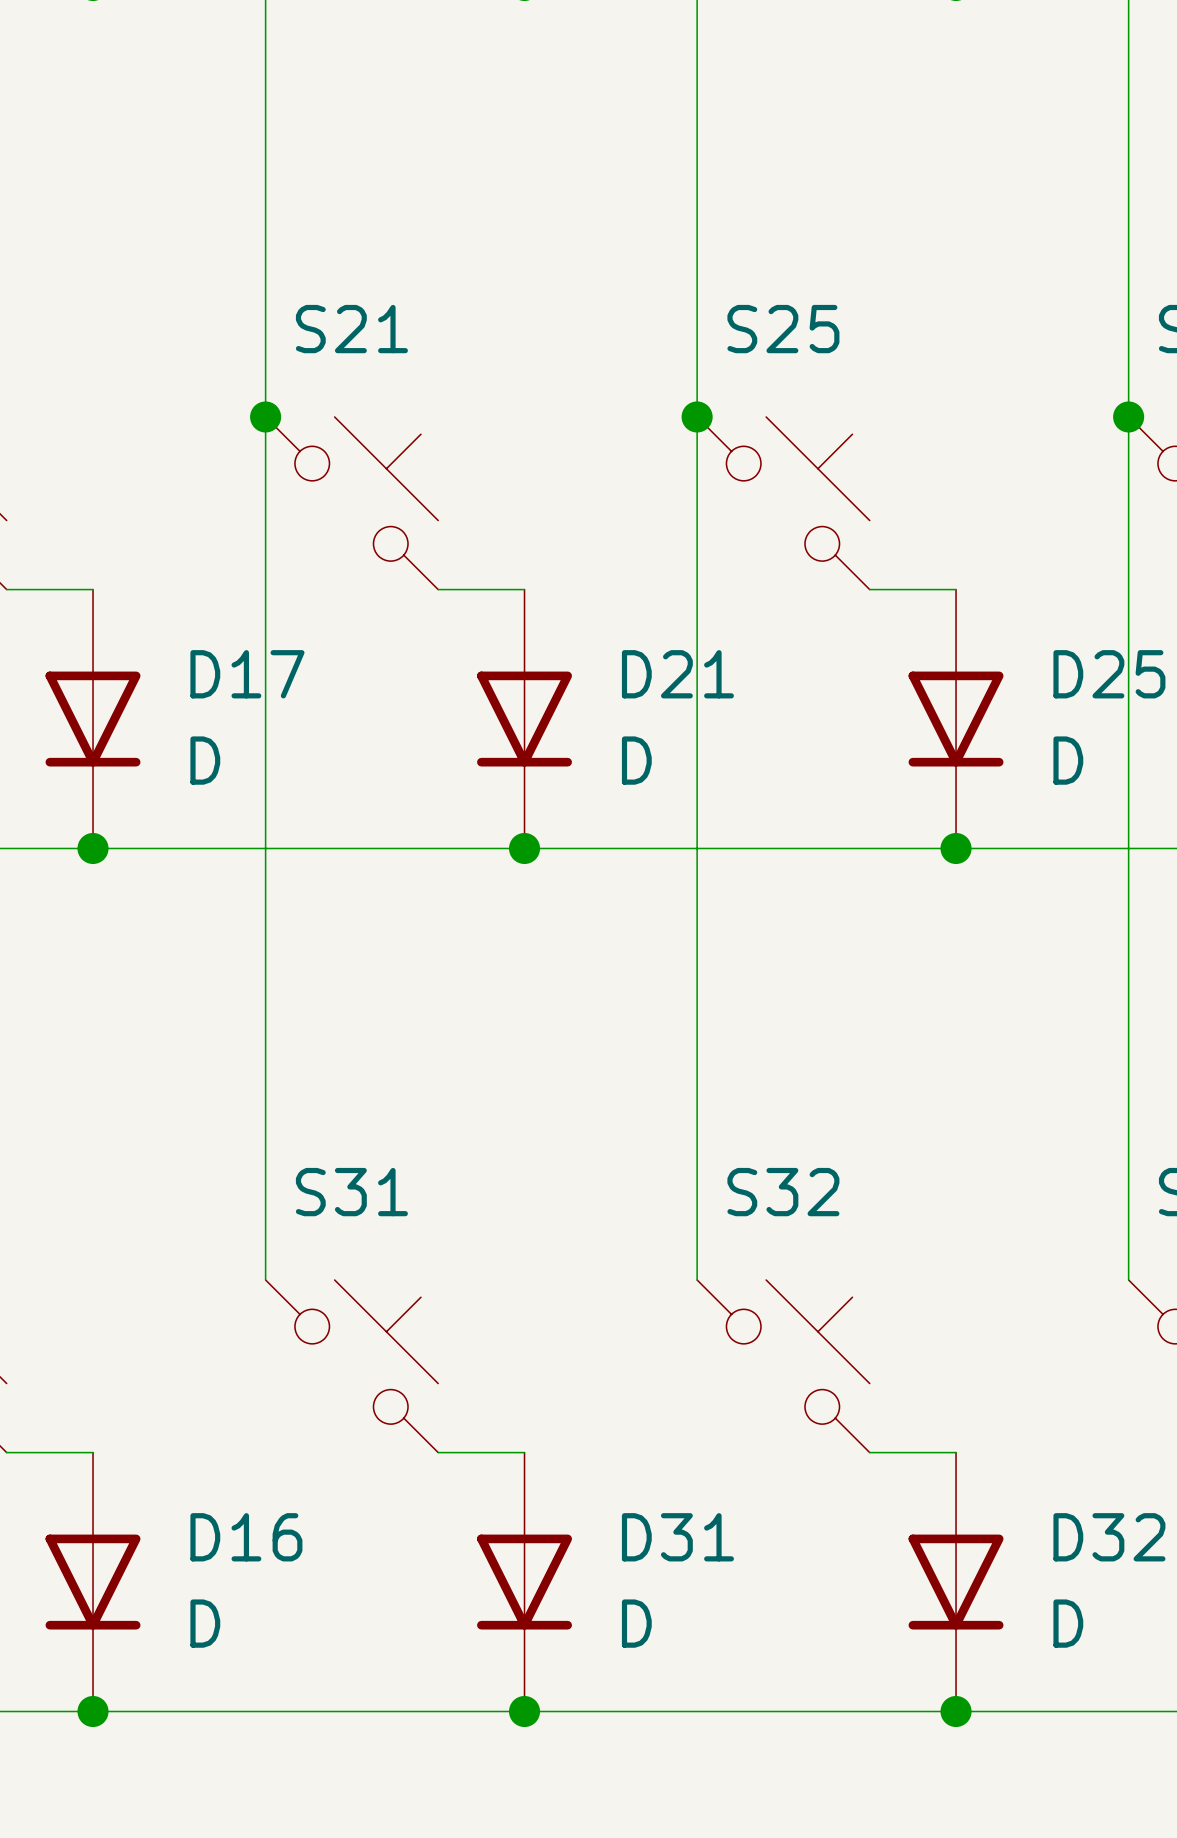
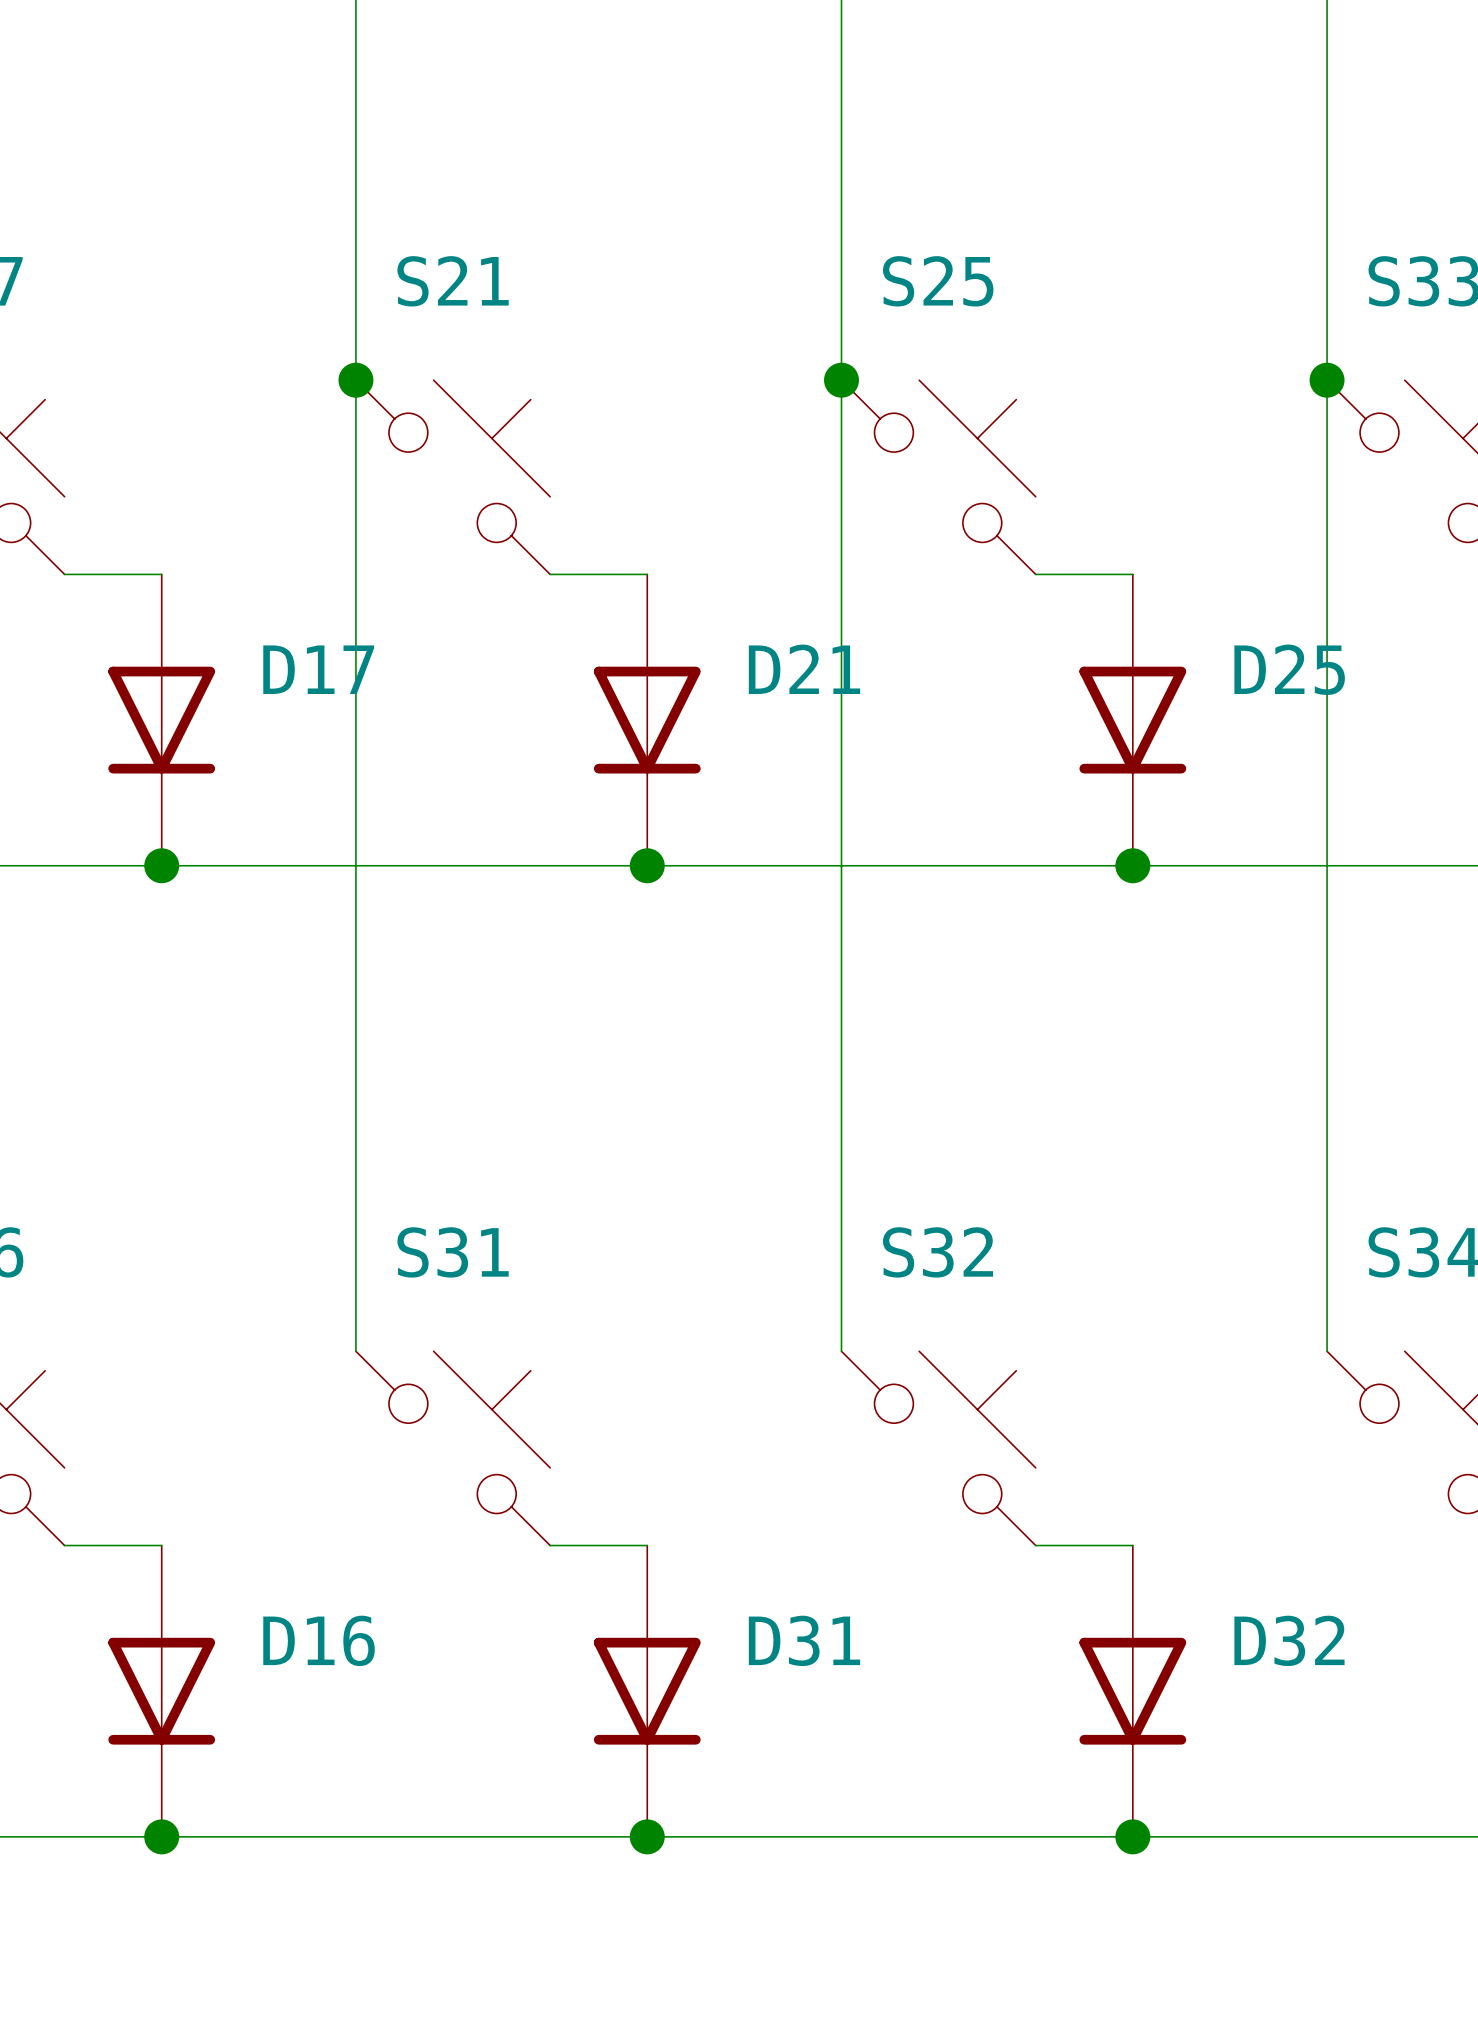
D17 value: D (205, 760) -> none
D21 value: D (636, 760) -> none
D25 value: D (1068, 760) -> none
D16 value: D (205, 1623) -> none
D31 value: D (636, 1623) -> none
D32 value: D (1068, 1623) -> none

